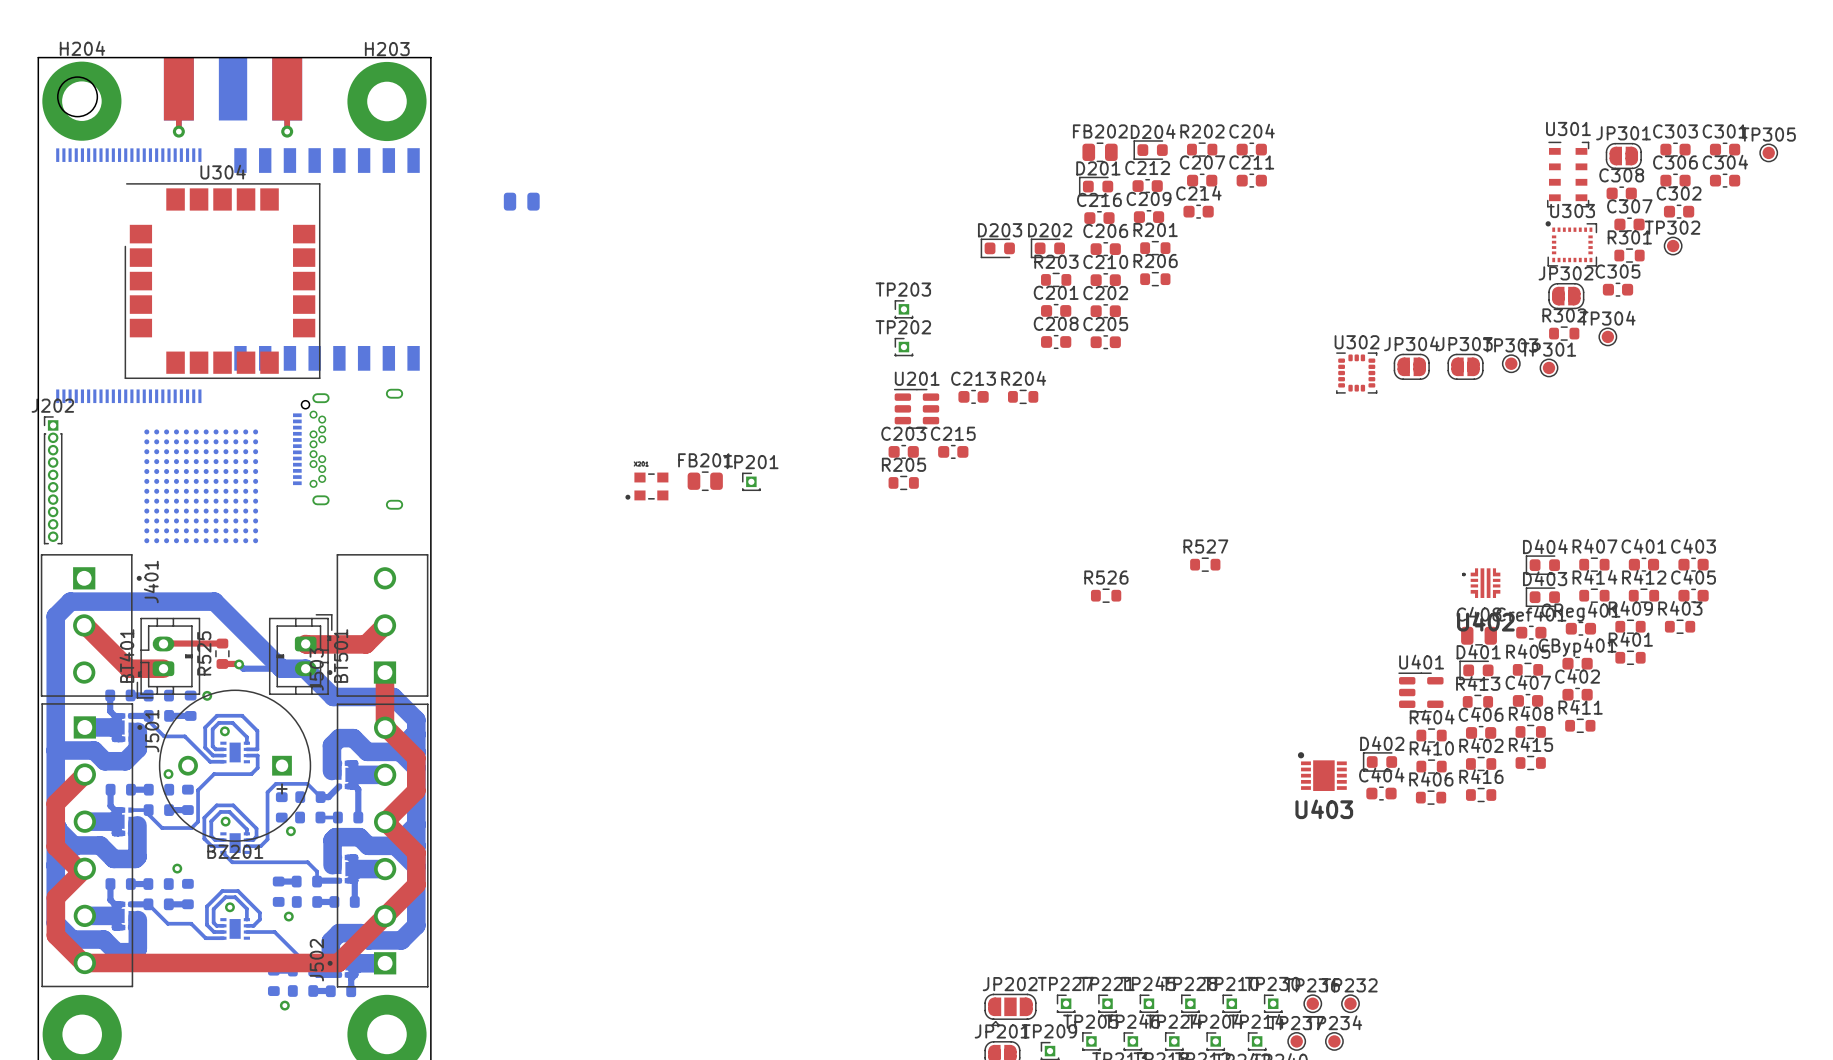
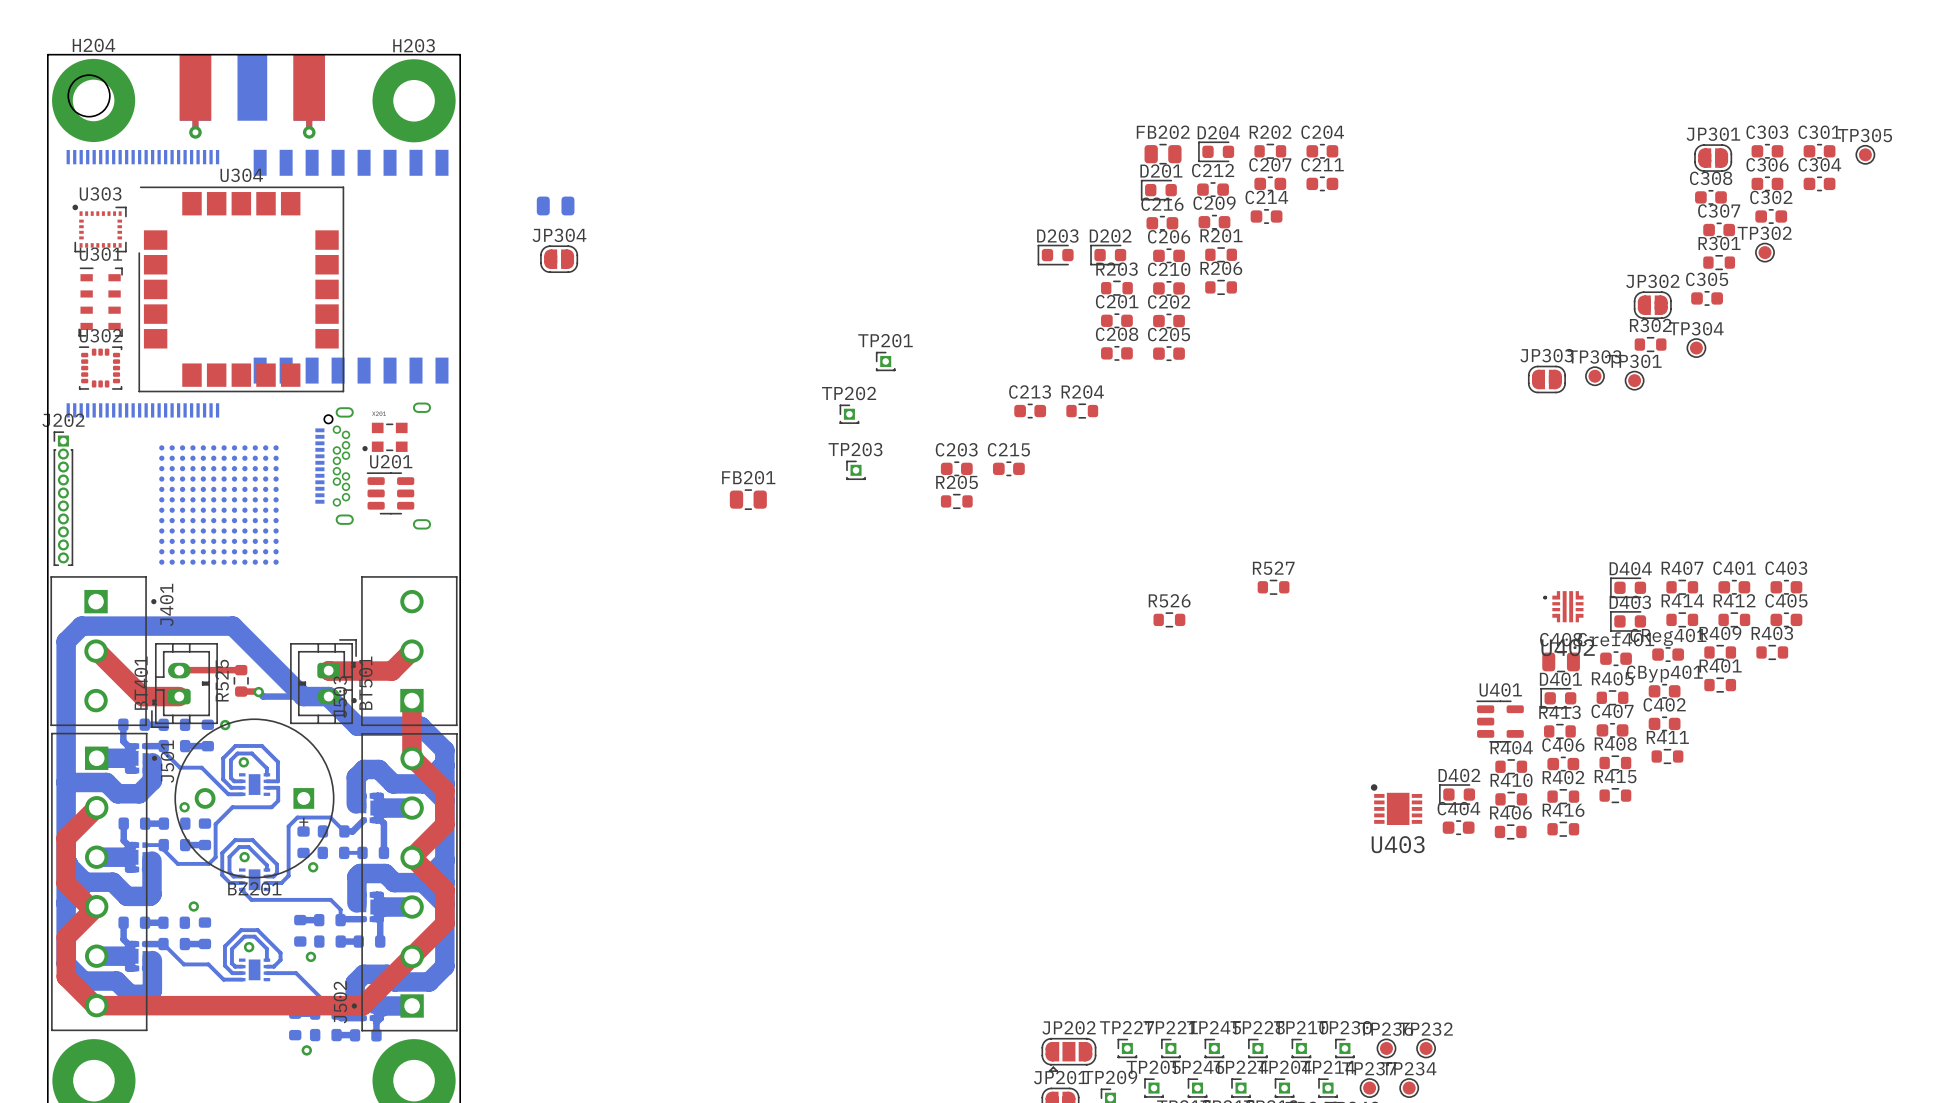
U301 position: (1568, 174) -> (100, 302)
U303 position: (1571, 243) -> (99, 228)
TP203 position: (903, 309) -> (856, 470)
TP202 position: (903, 347) -> (849, 414)
JP304 position: (1411, 366) -> (559, 259)
U302 position: (1356, 373) -> (100, 368)
U201 position: (916, 408) -> (390, 493)
TP201 position: (751, 481) -> (885, 361)
part position: (646, 486) -> (385, 437)

